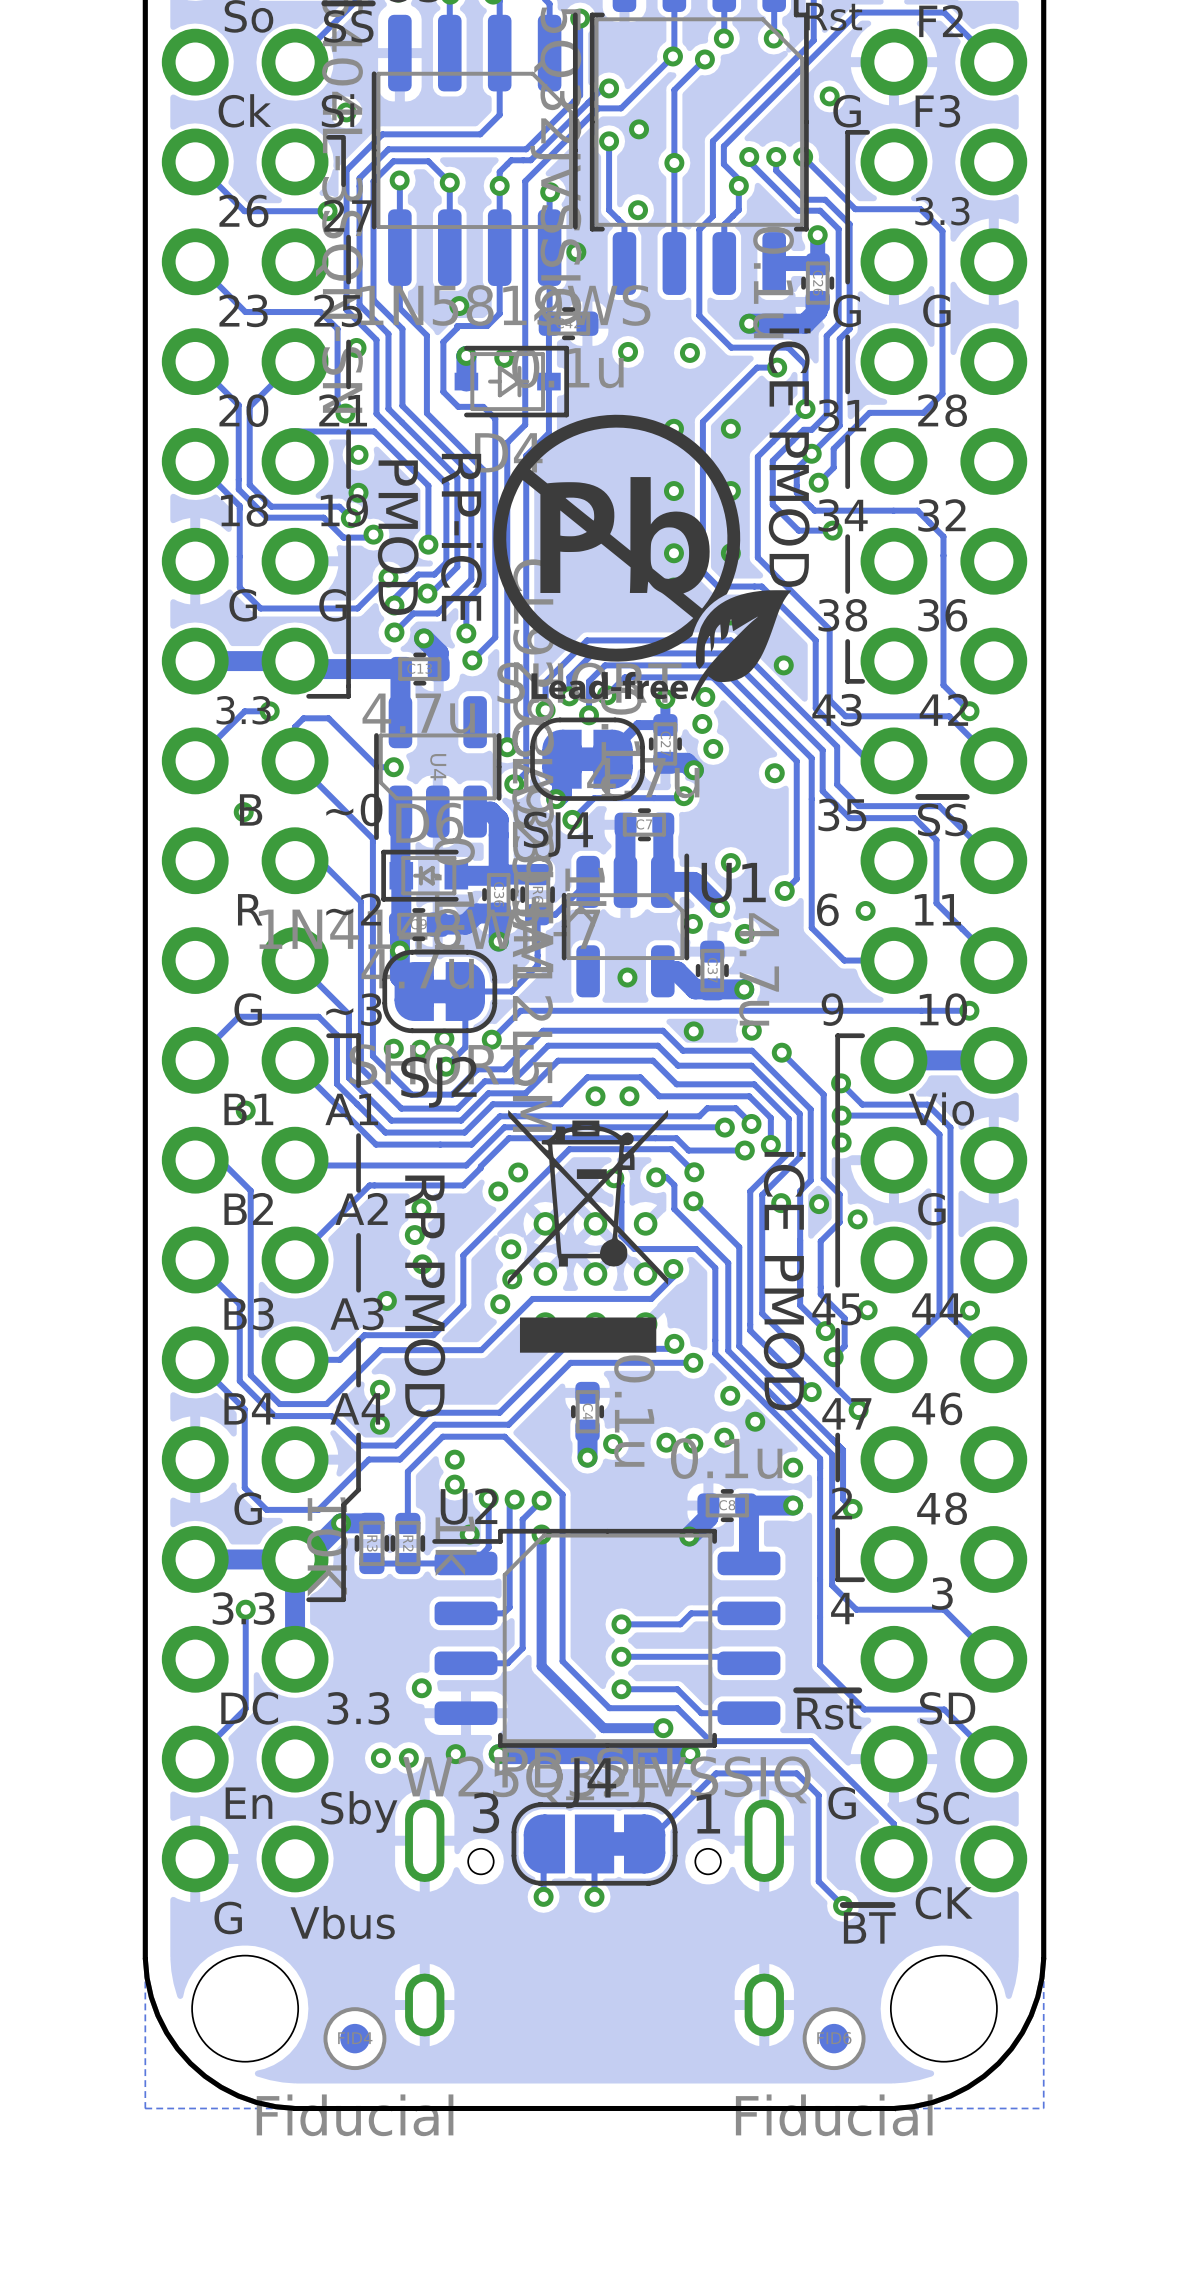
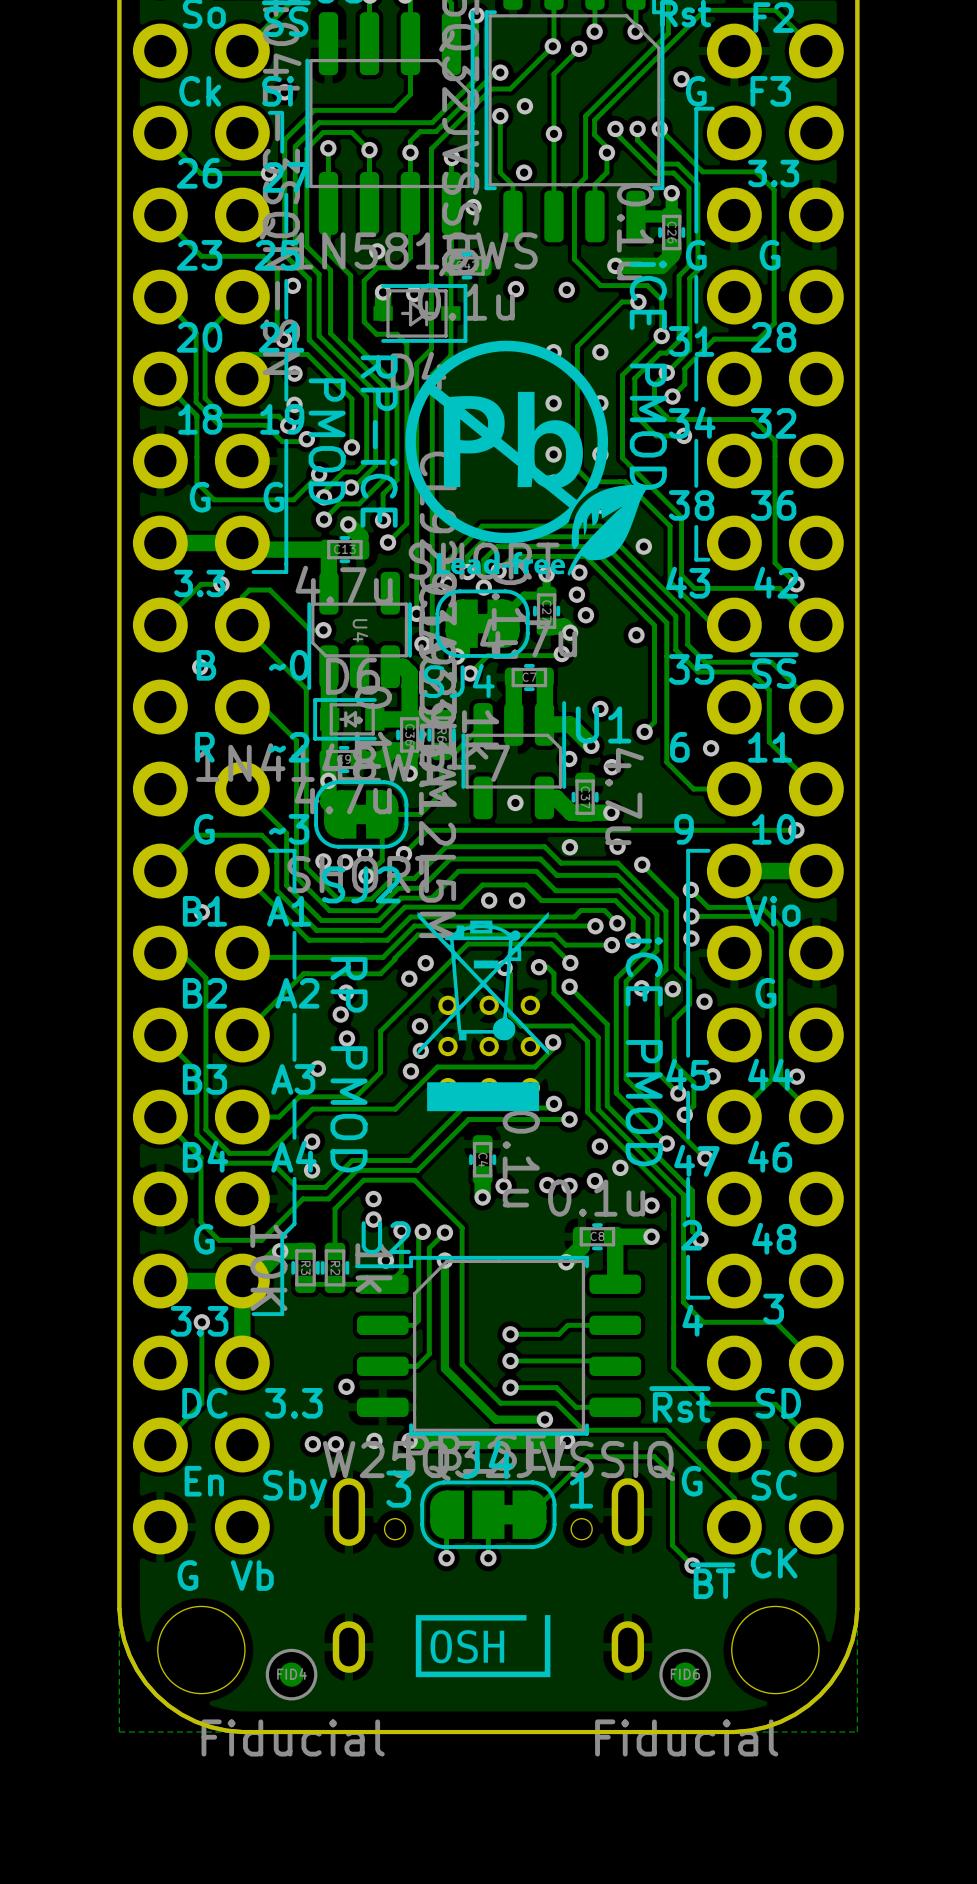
text: Vbus (342, 1922) -> Vb (252, 1575)
drawing: none -> [415, 1615, 551, 1678]

